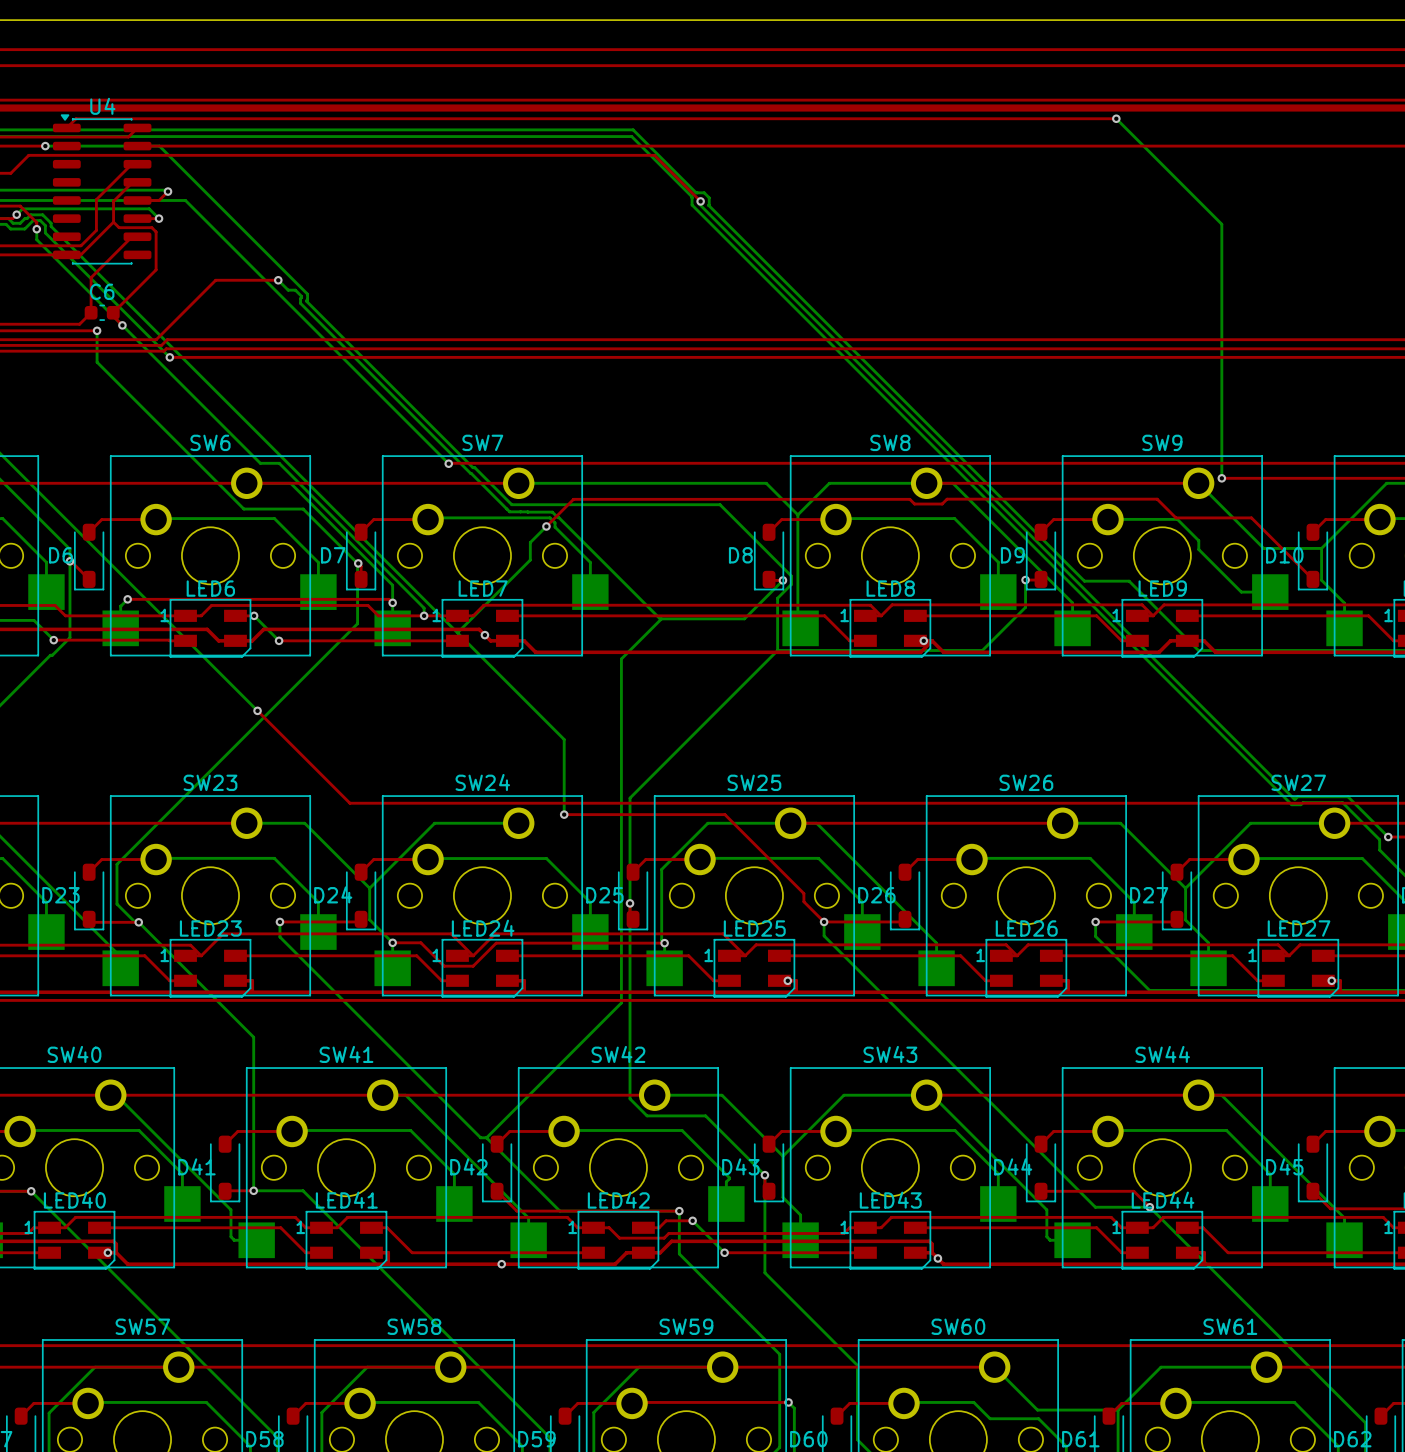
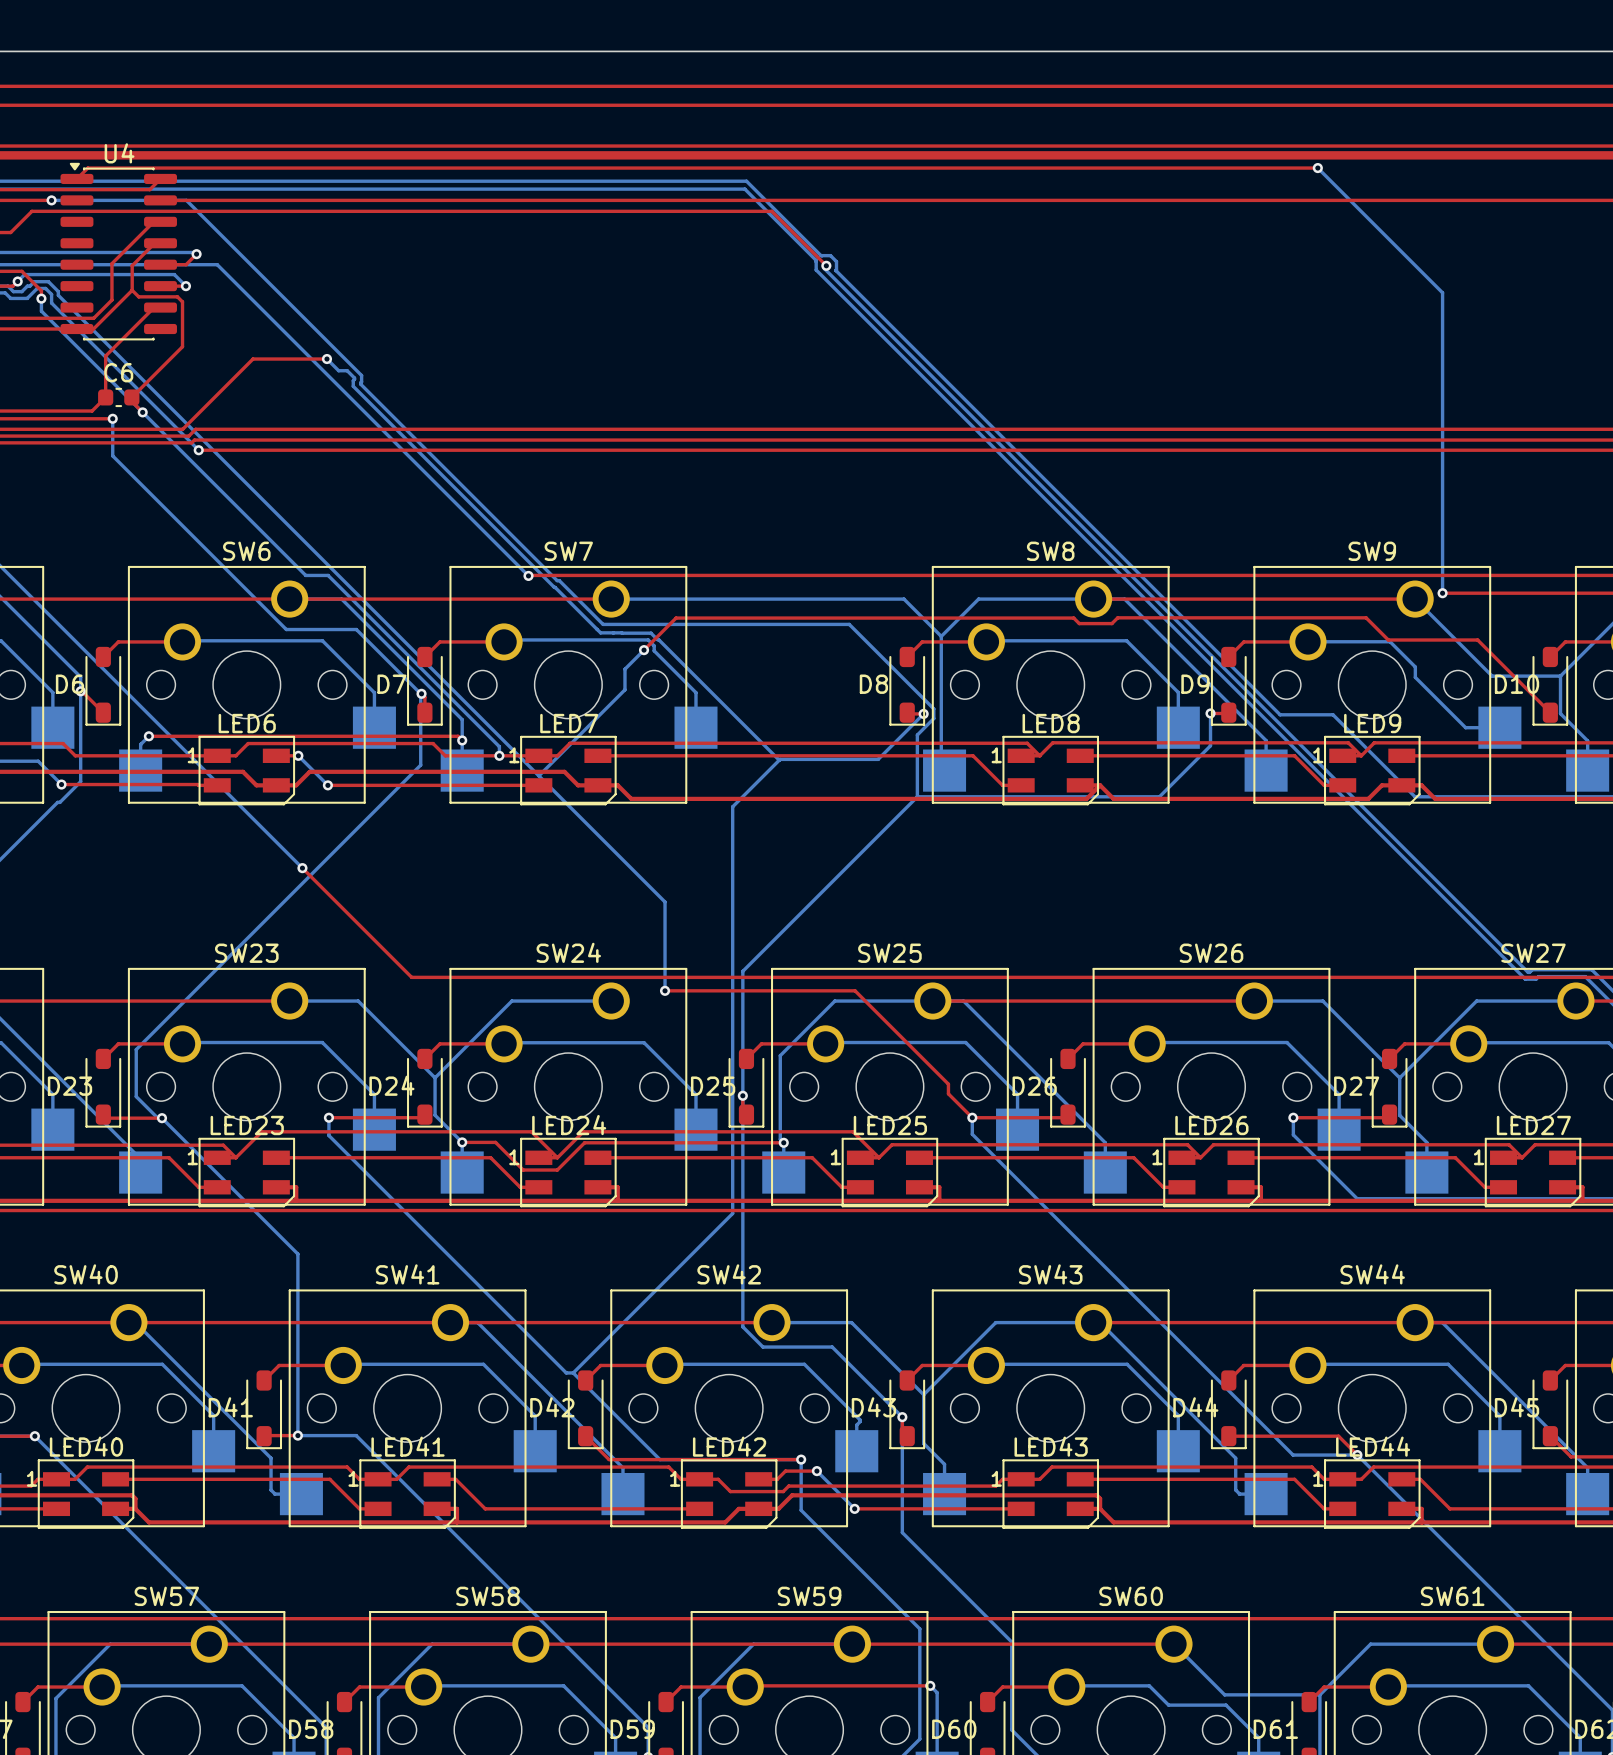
via: (484, 635) -> none
via: (923, 640) -> none
via: (787, 980) -> none
via: (1331, 980) -> none
via: (107, 1252) -> none
via: (937, 1258) -> none
via: (501, 1264) -> none

